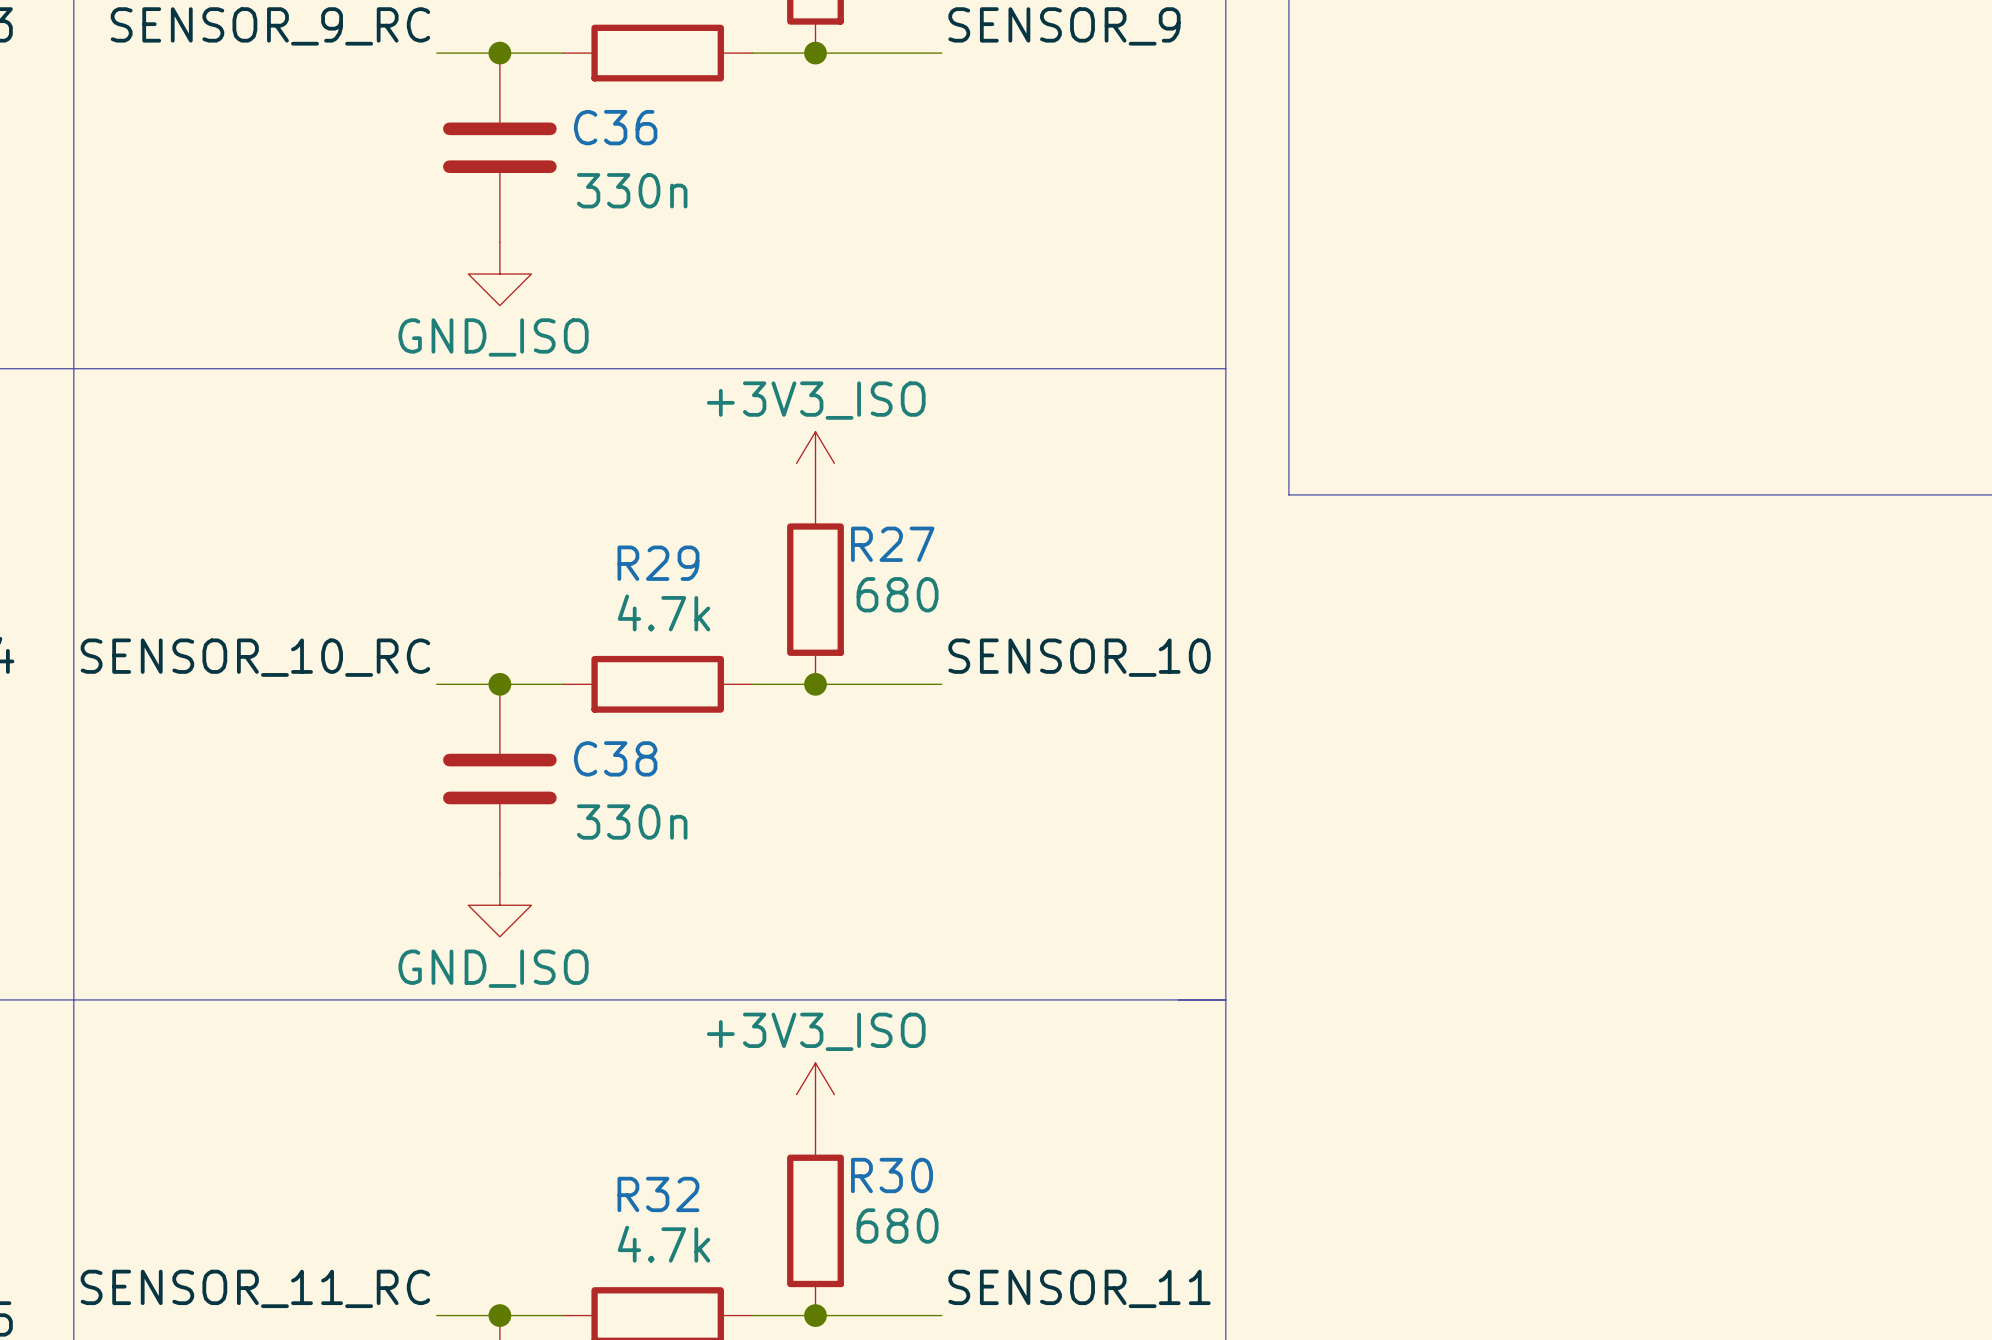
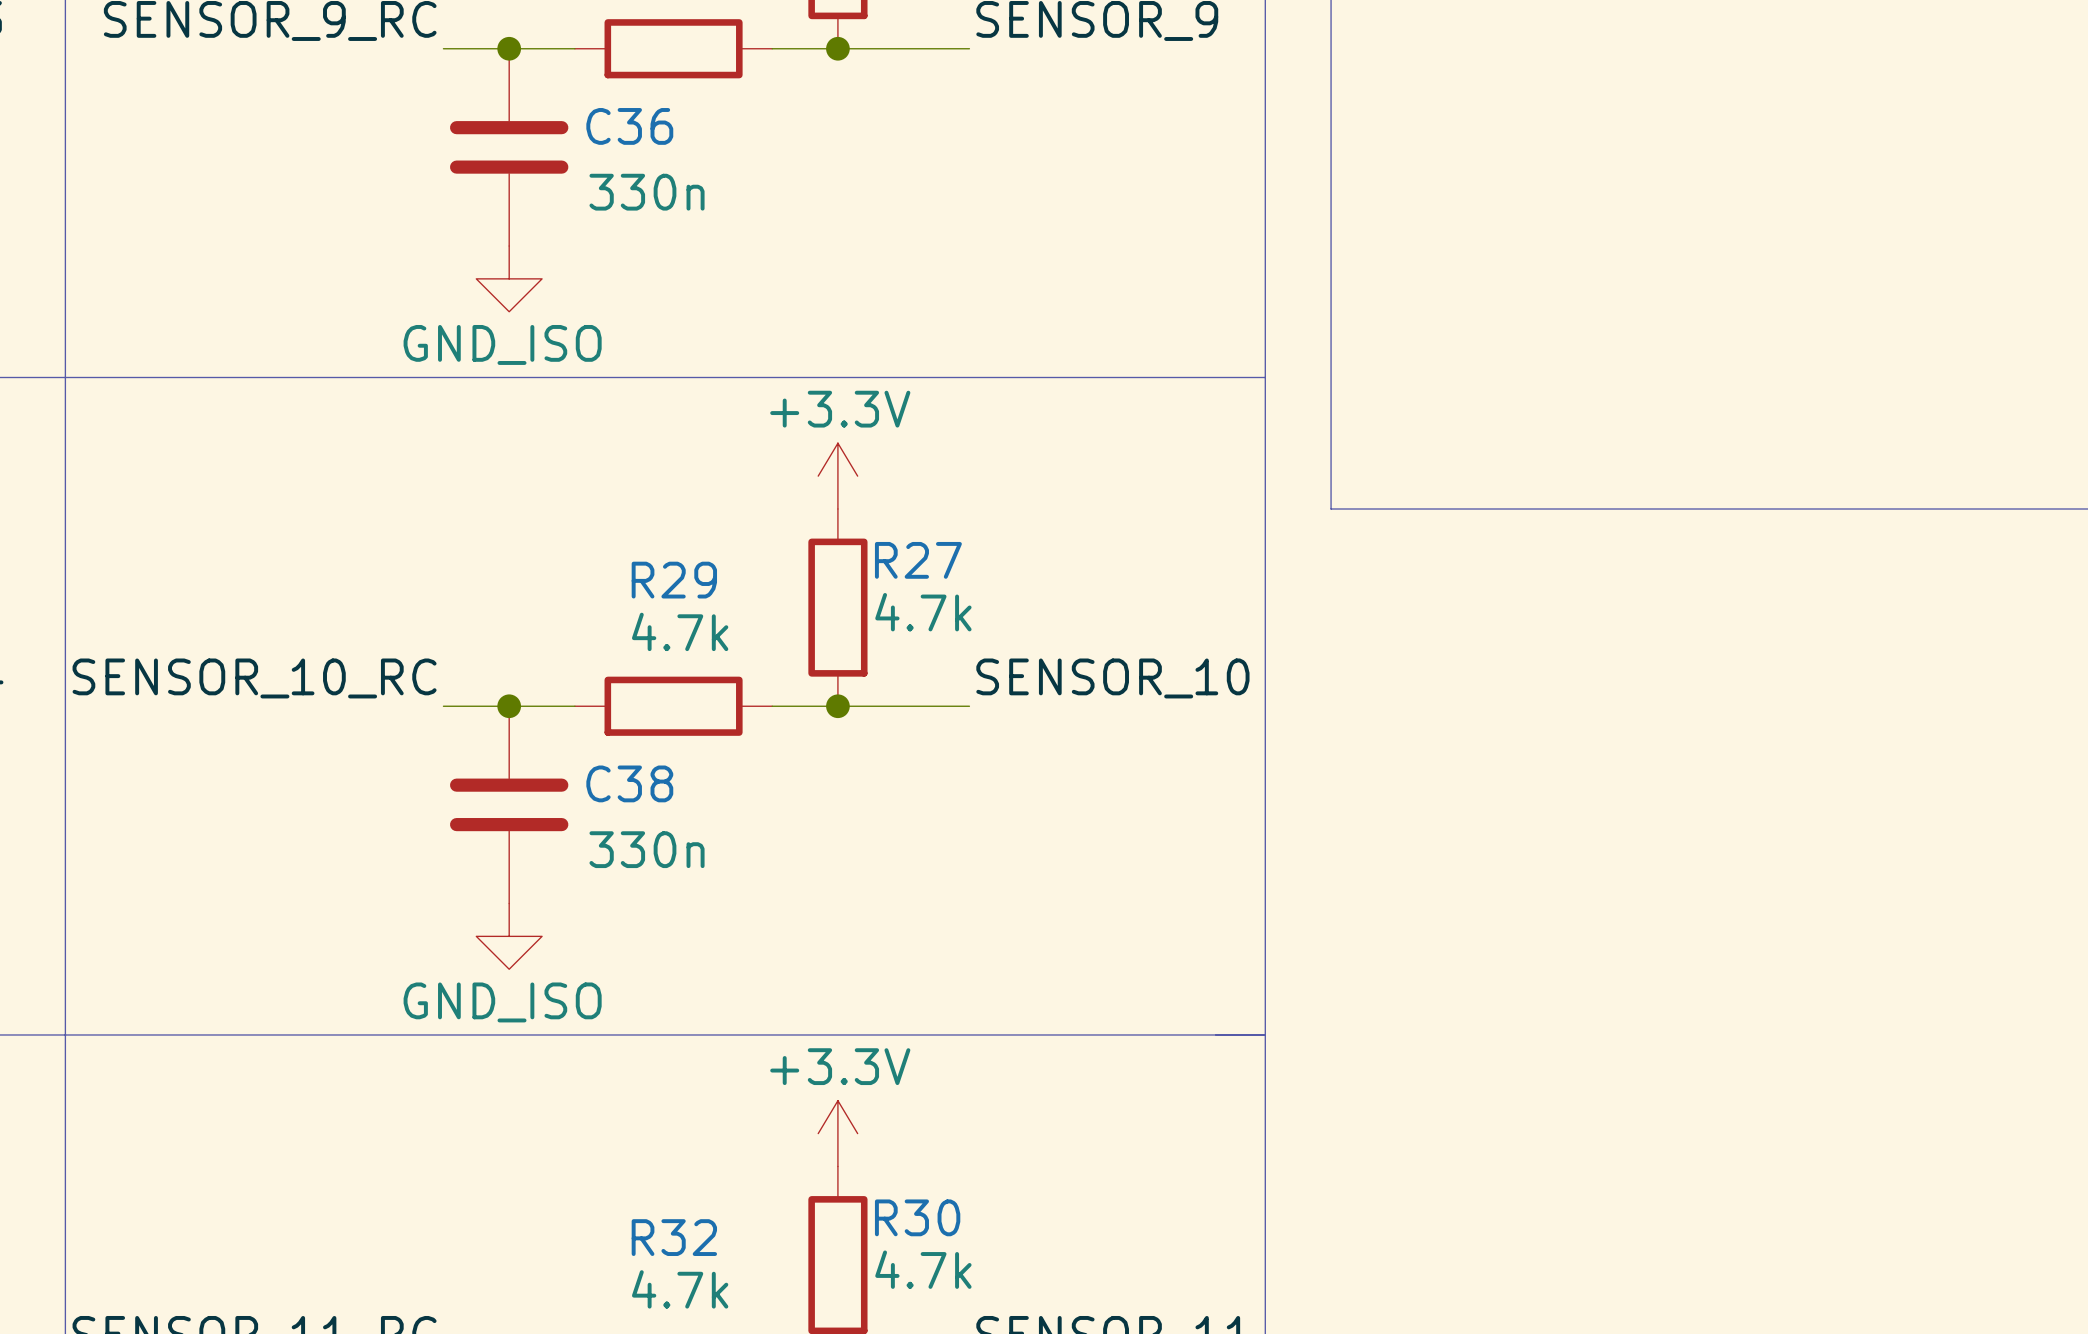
power symbol: +3V3_ISO (815, 463) -> +3.3V (837, 476)
R27 value: 680 (897, 594) -> 4.7k (923, 612)
power symbol: +3V3_ISO (815, 1094) -> +3.3V (837, 1133)
R30 value: 680 (897, 1226) -> 4.7k (923, 1269)

